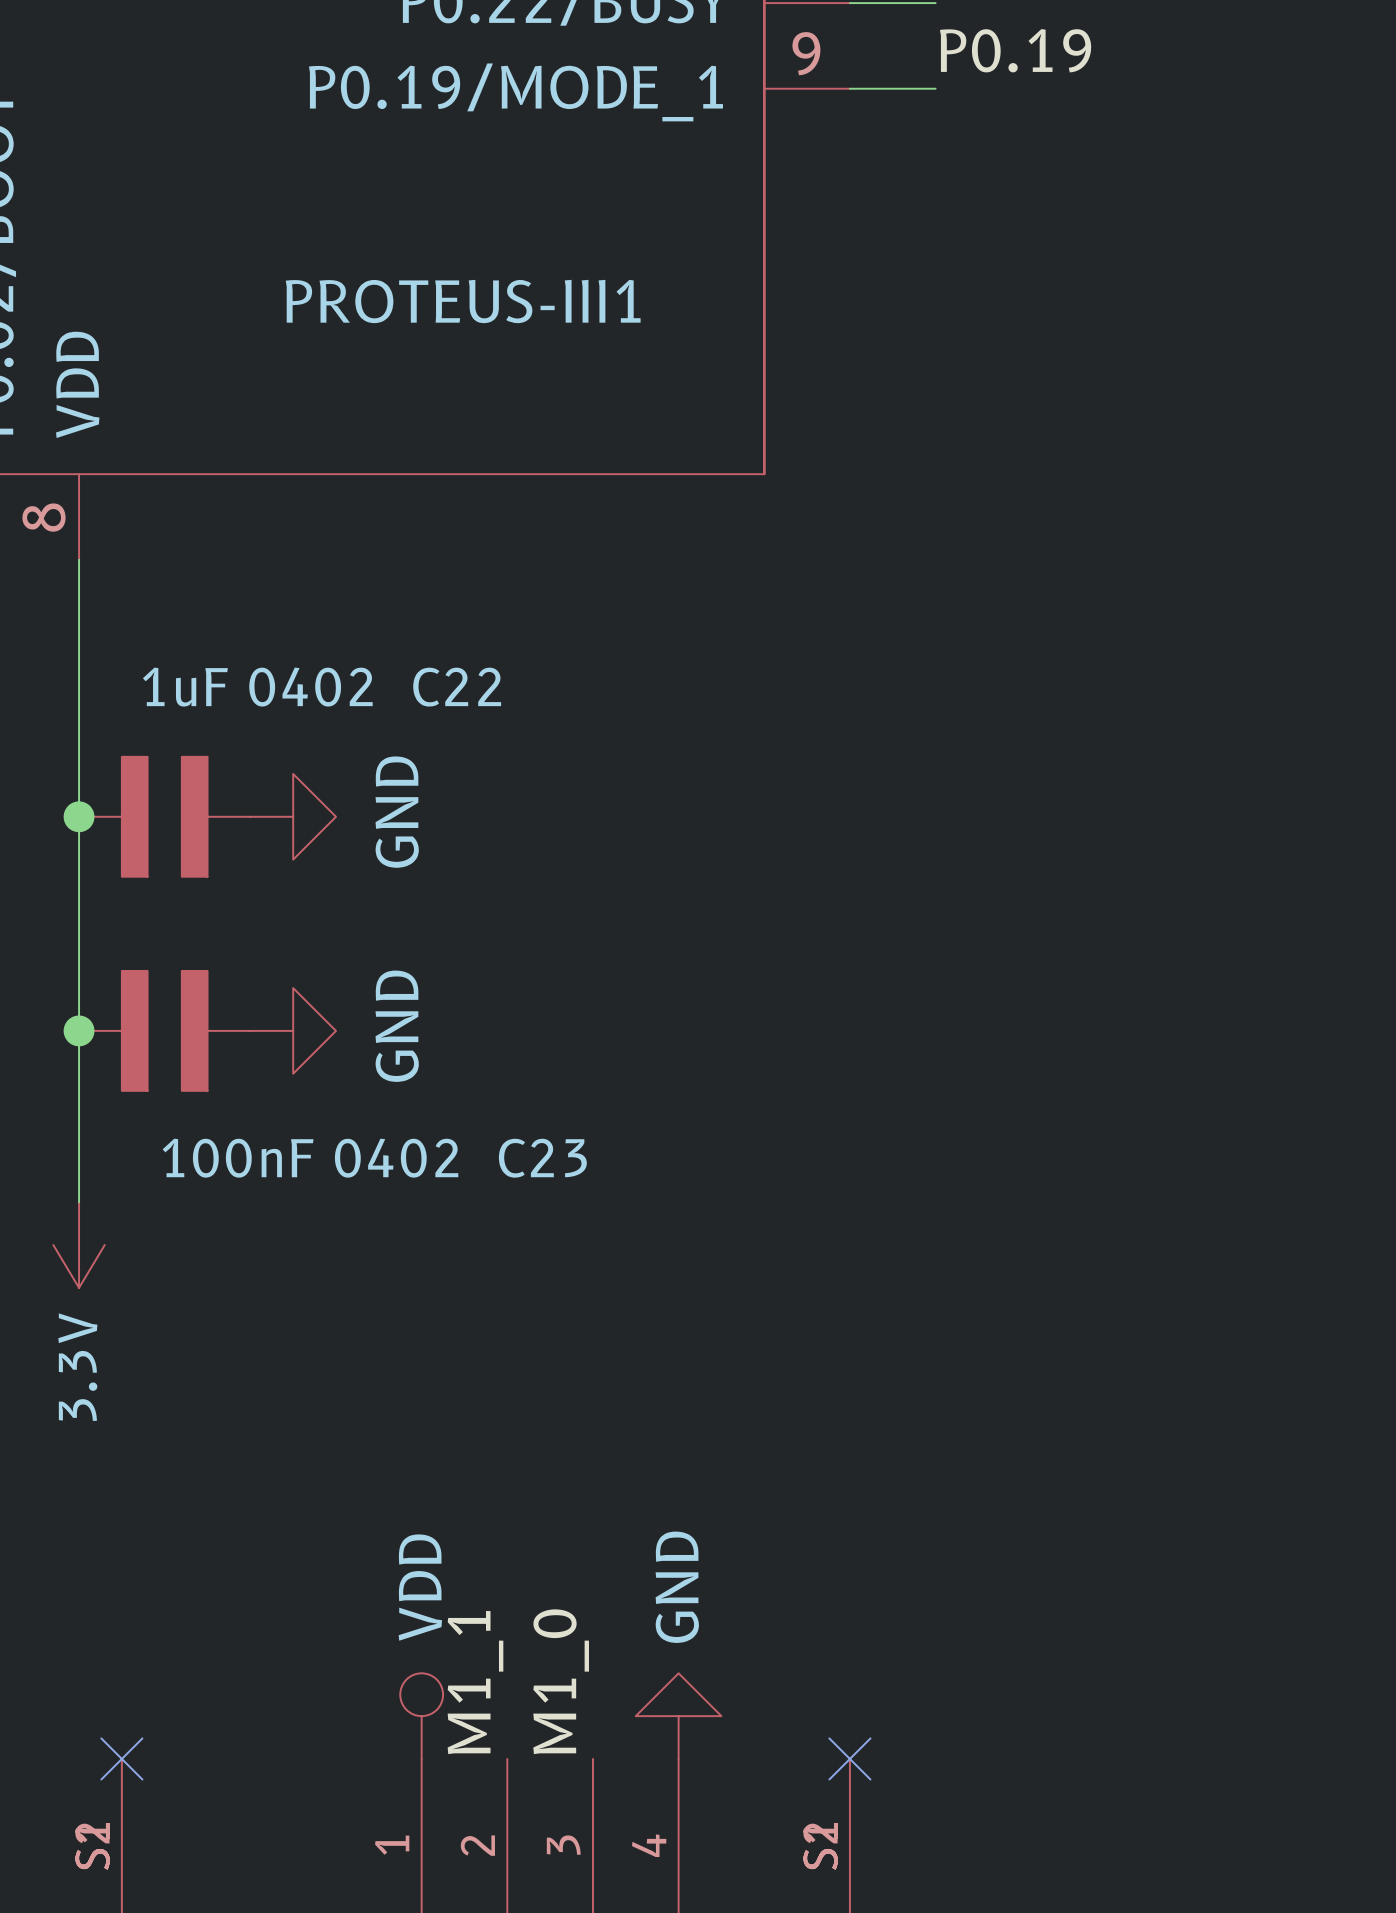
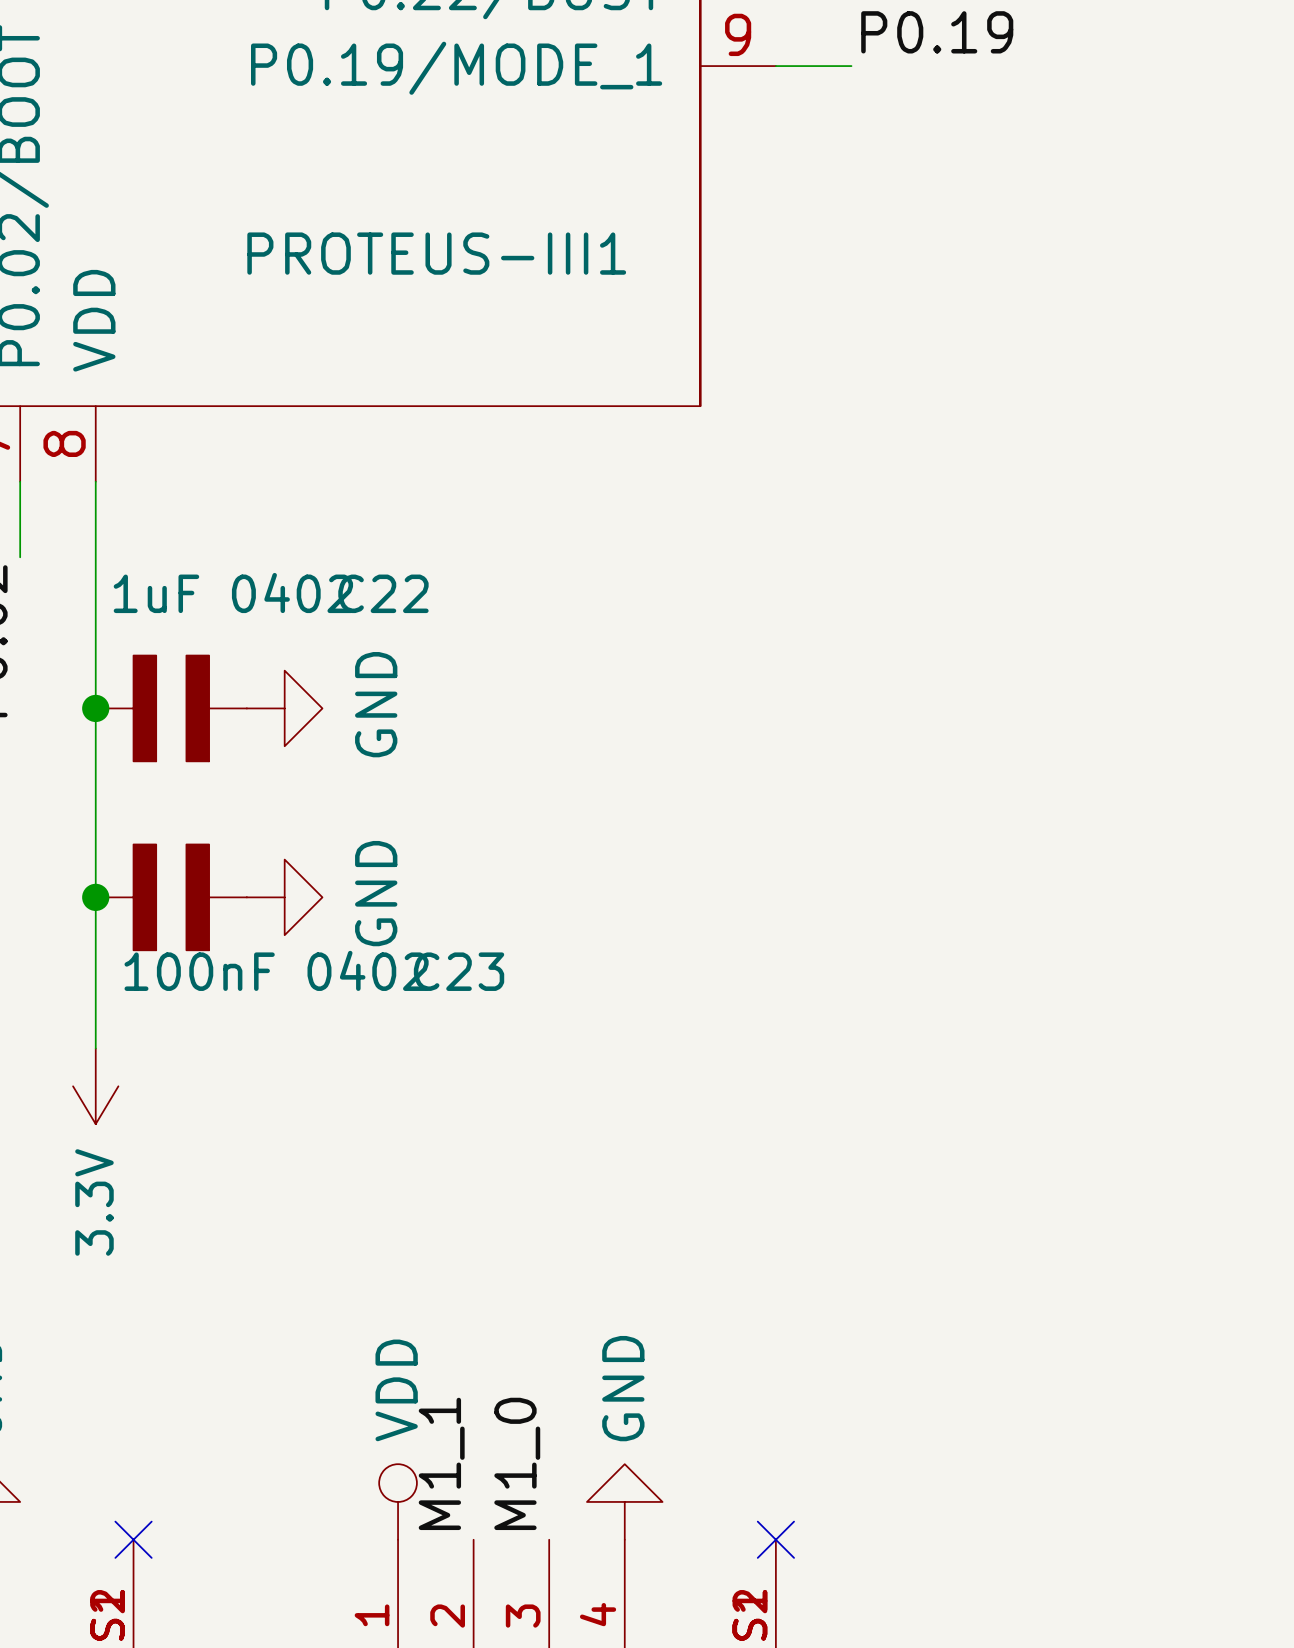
C22 name position: C22 (457, 687) -> C22 (383, 593)
C23 value position: 100nF 0402 (310, 1158) -> 100nF 0402 (276, 970)
C23 name position: C23 (542, 1158) -> C23 (459, 971)

